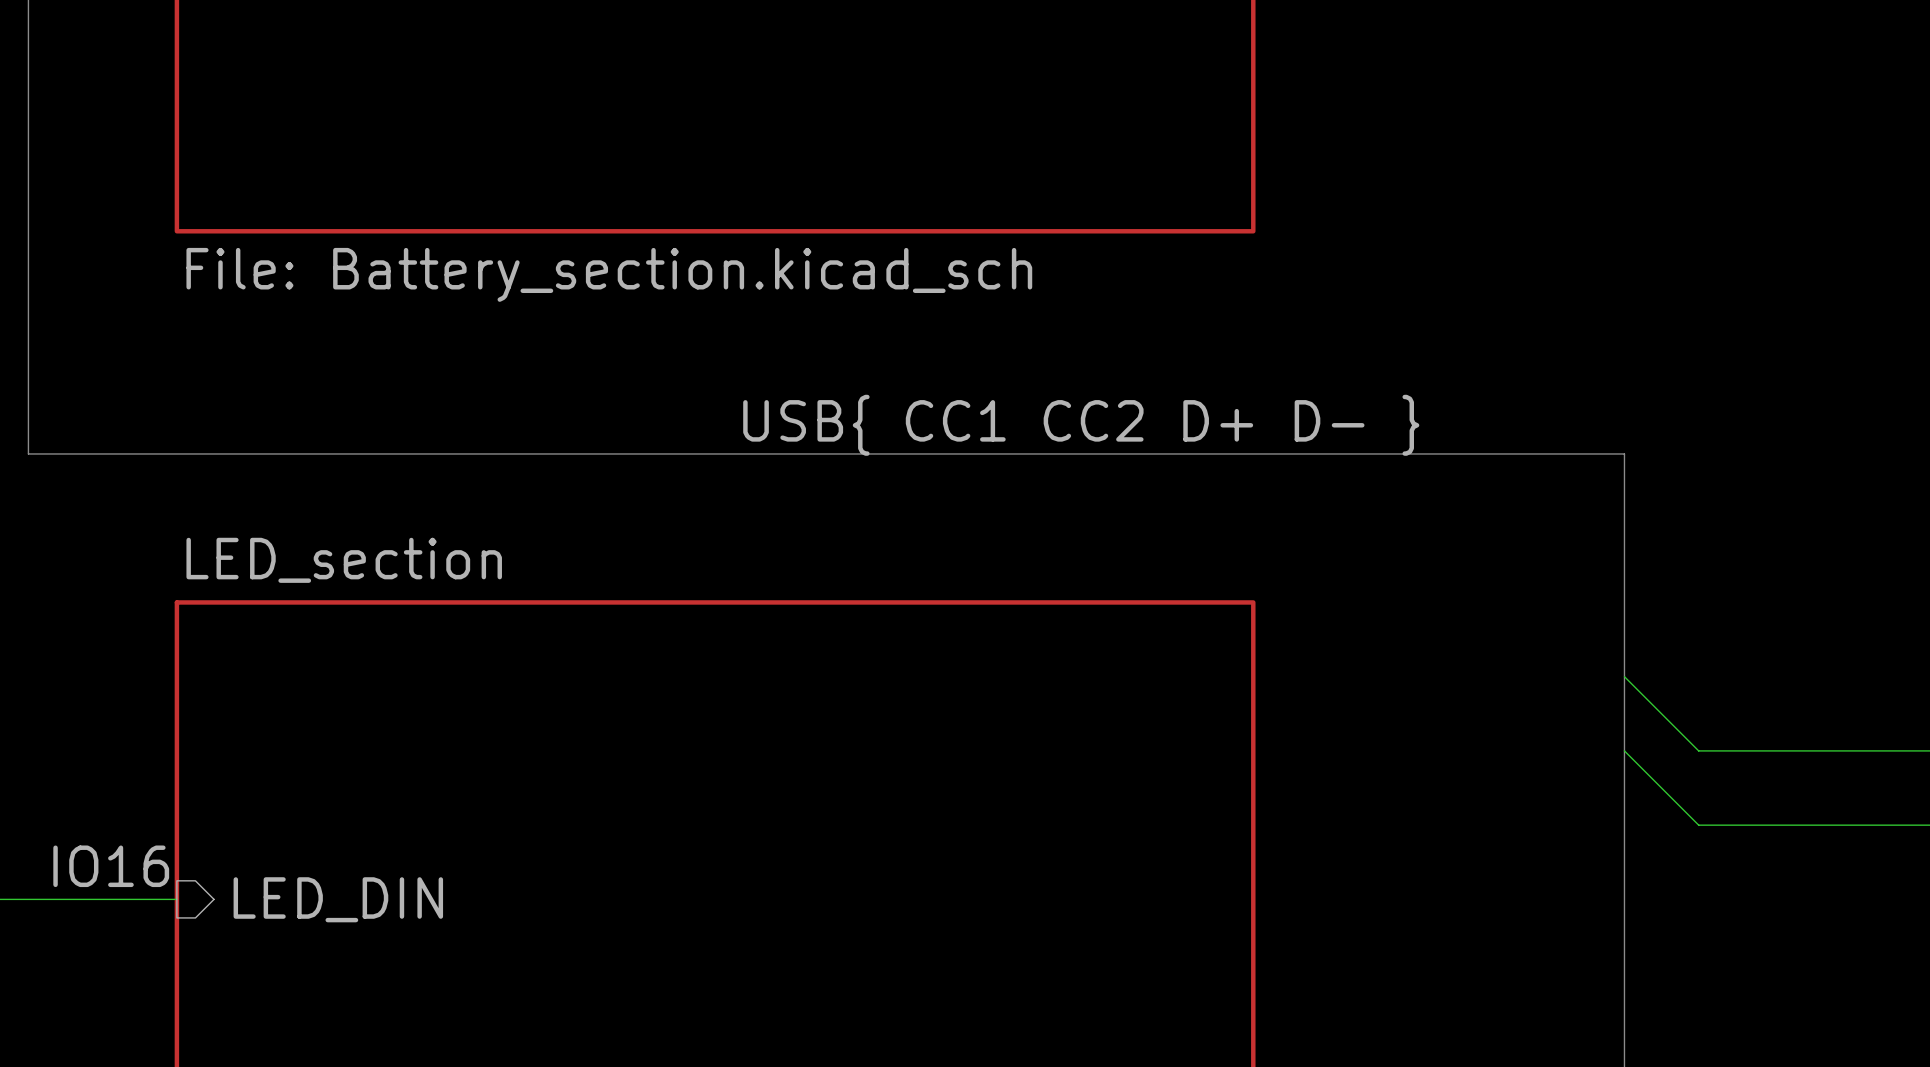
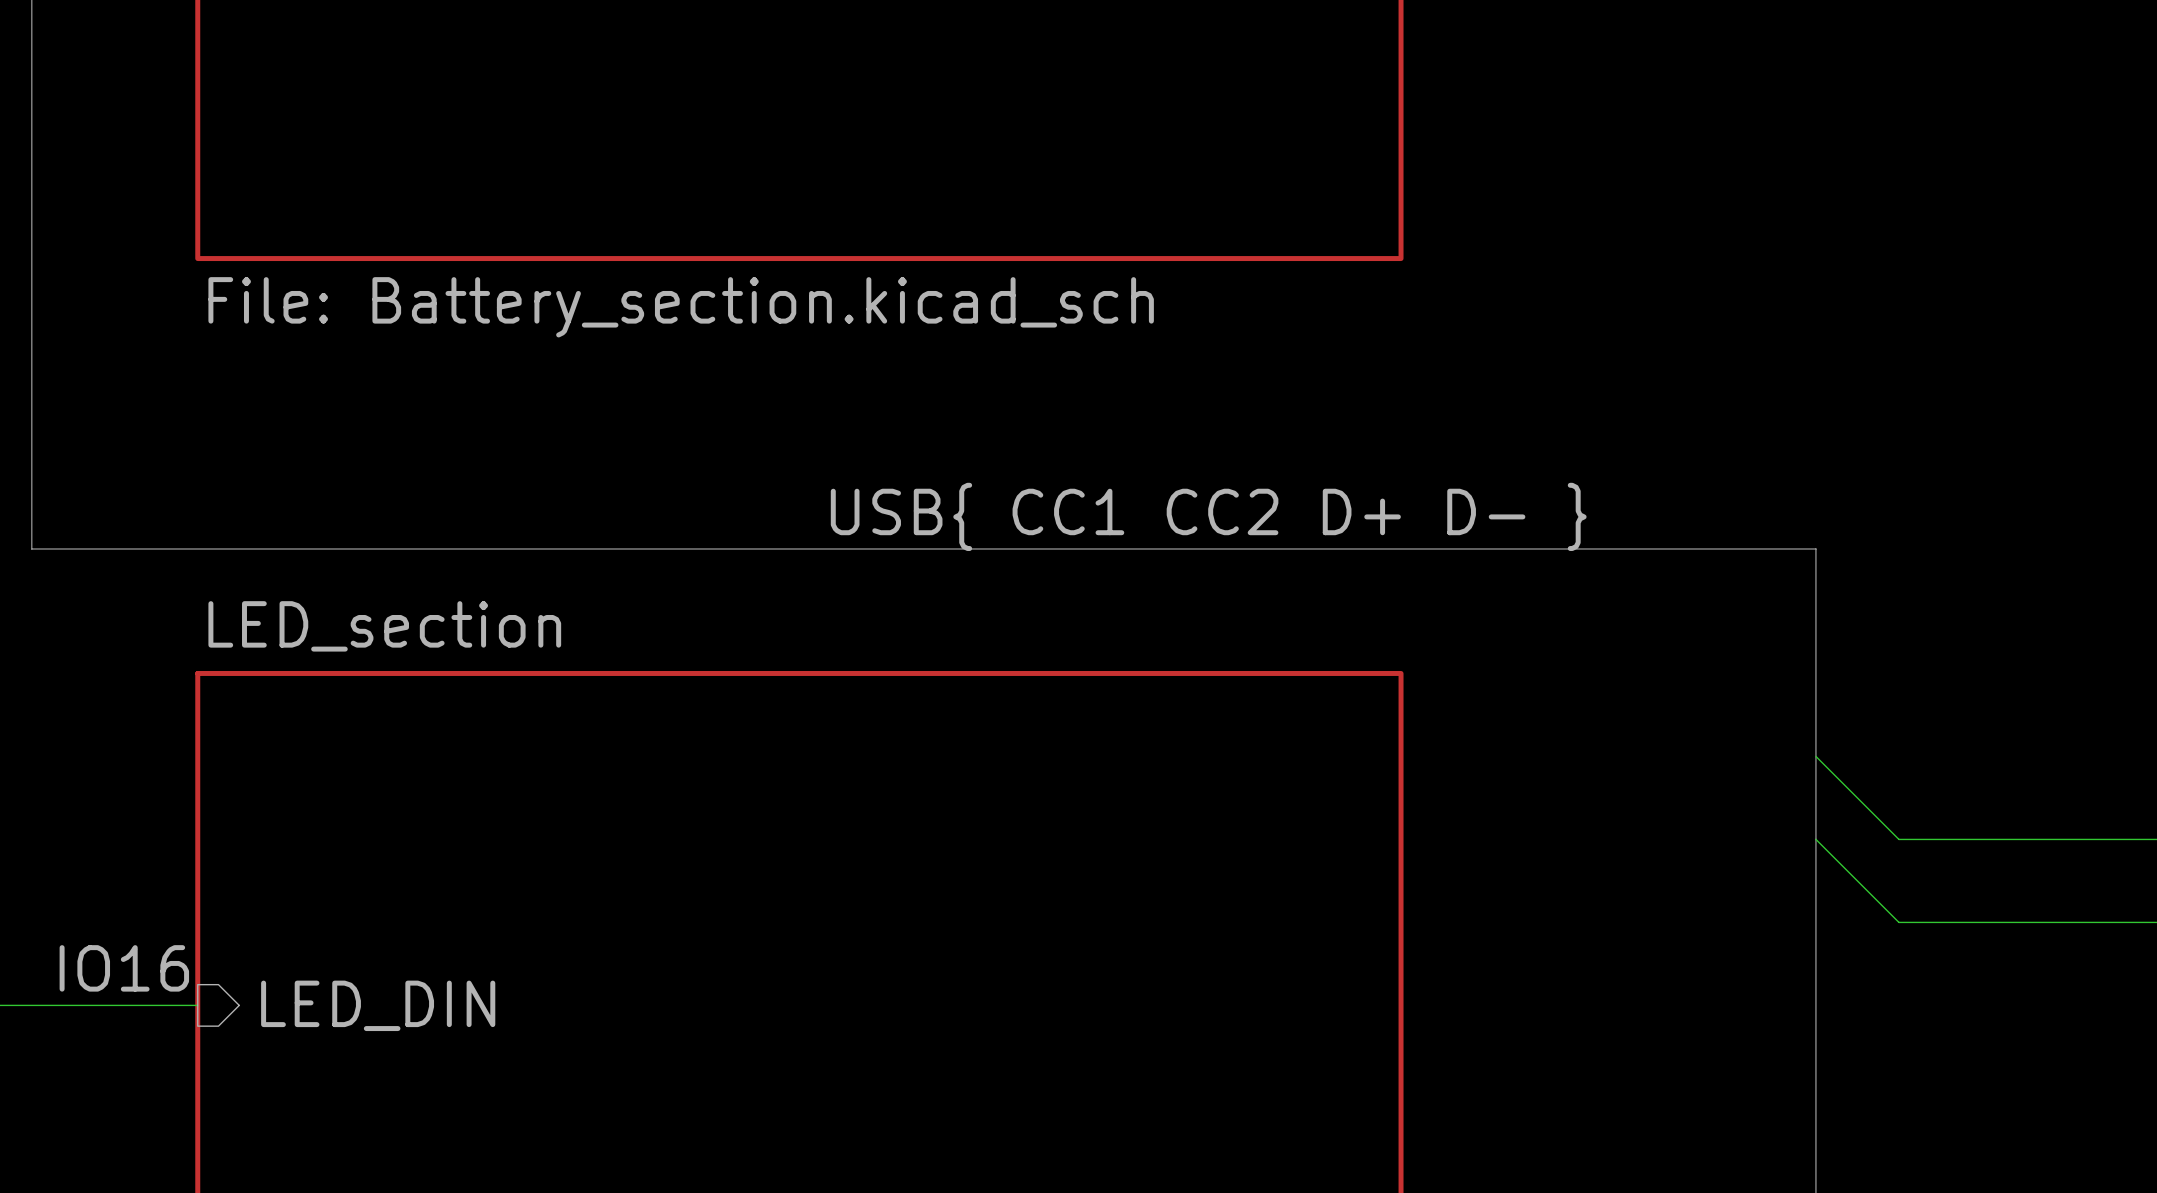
label position: USB{ CC1 CC2 D+ D- } (1081, 425) -> USB{ CC1 CC2 D+ D- } (1208, 516)
bus: (28, 453) (1624, 453) (1624, 491) -> (31, 507) (31, 548) (1815, 548)

